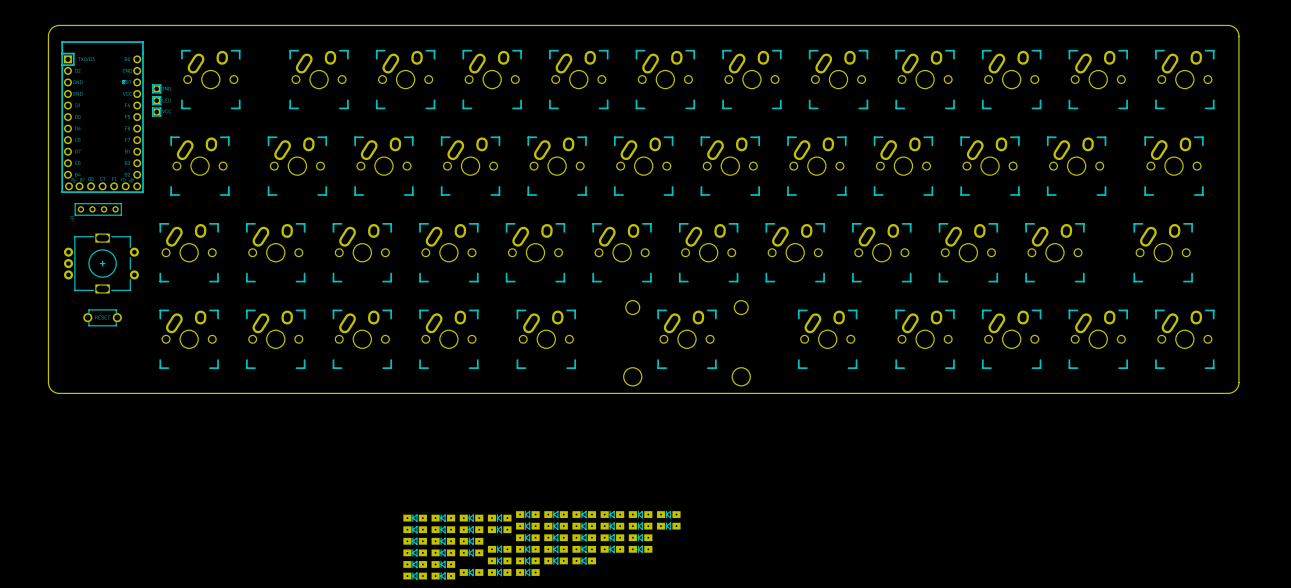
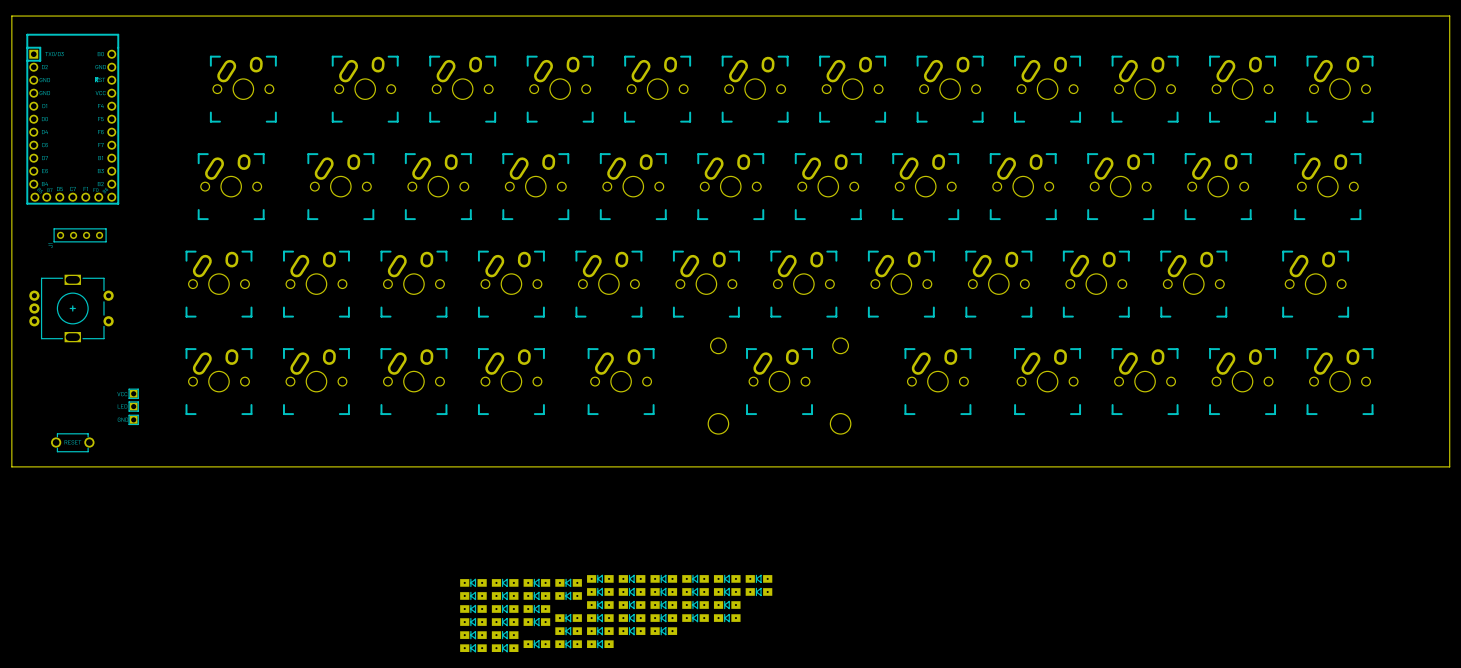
board edge: (59, 25) (1230, 25) (1236, 29) (1238, 36) (1238, 385) (1234, 391) (1228, 393) (56, 393) (50, 389) (48, 382) (48, 36) (51, 28) (59, 25) -> (11, 16) (11, 466) (1449, 466) (1449, 16) (11, 16)
part: (156, 100) -> none
part position: (102, 117) -> (72, 119)
part position: (98, 209) -> (80, 235)
part position: (101, 263) -> (71, 308)
part position: (102, 317) -> (72, 442)
part: none -> (133, 406)

